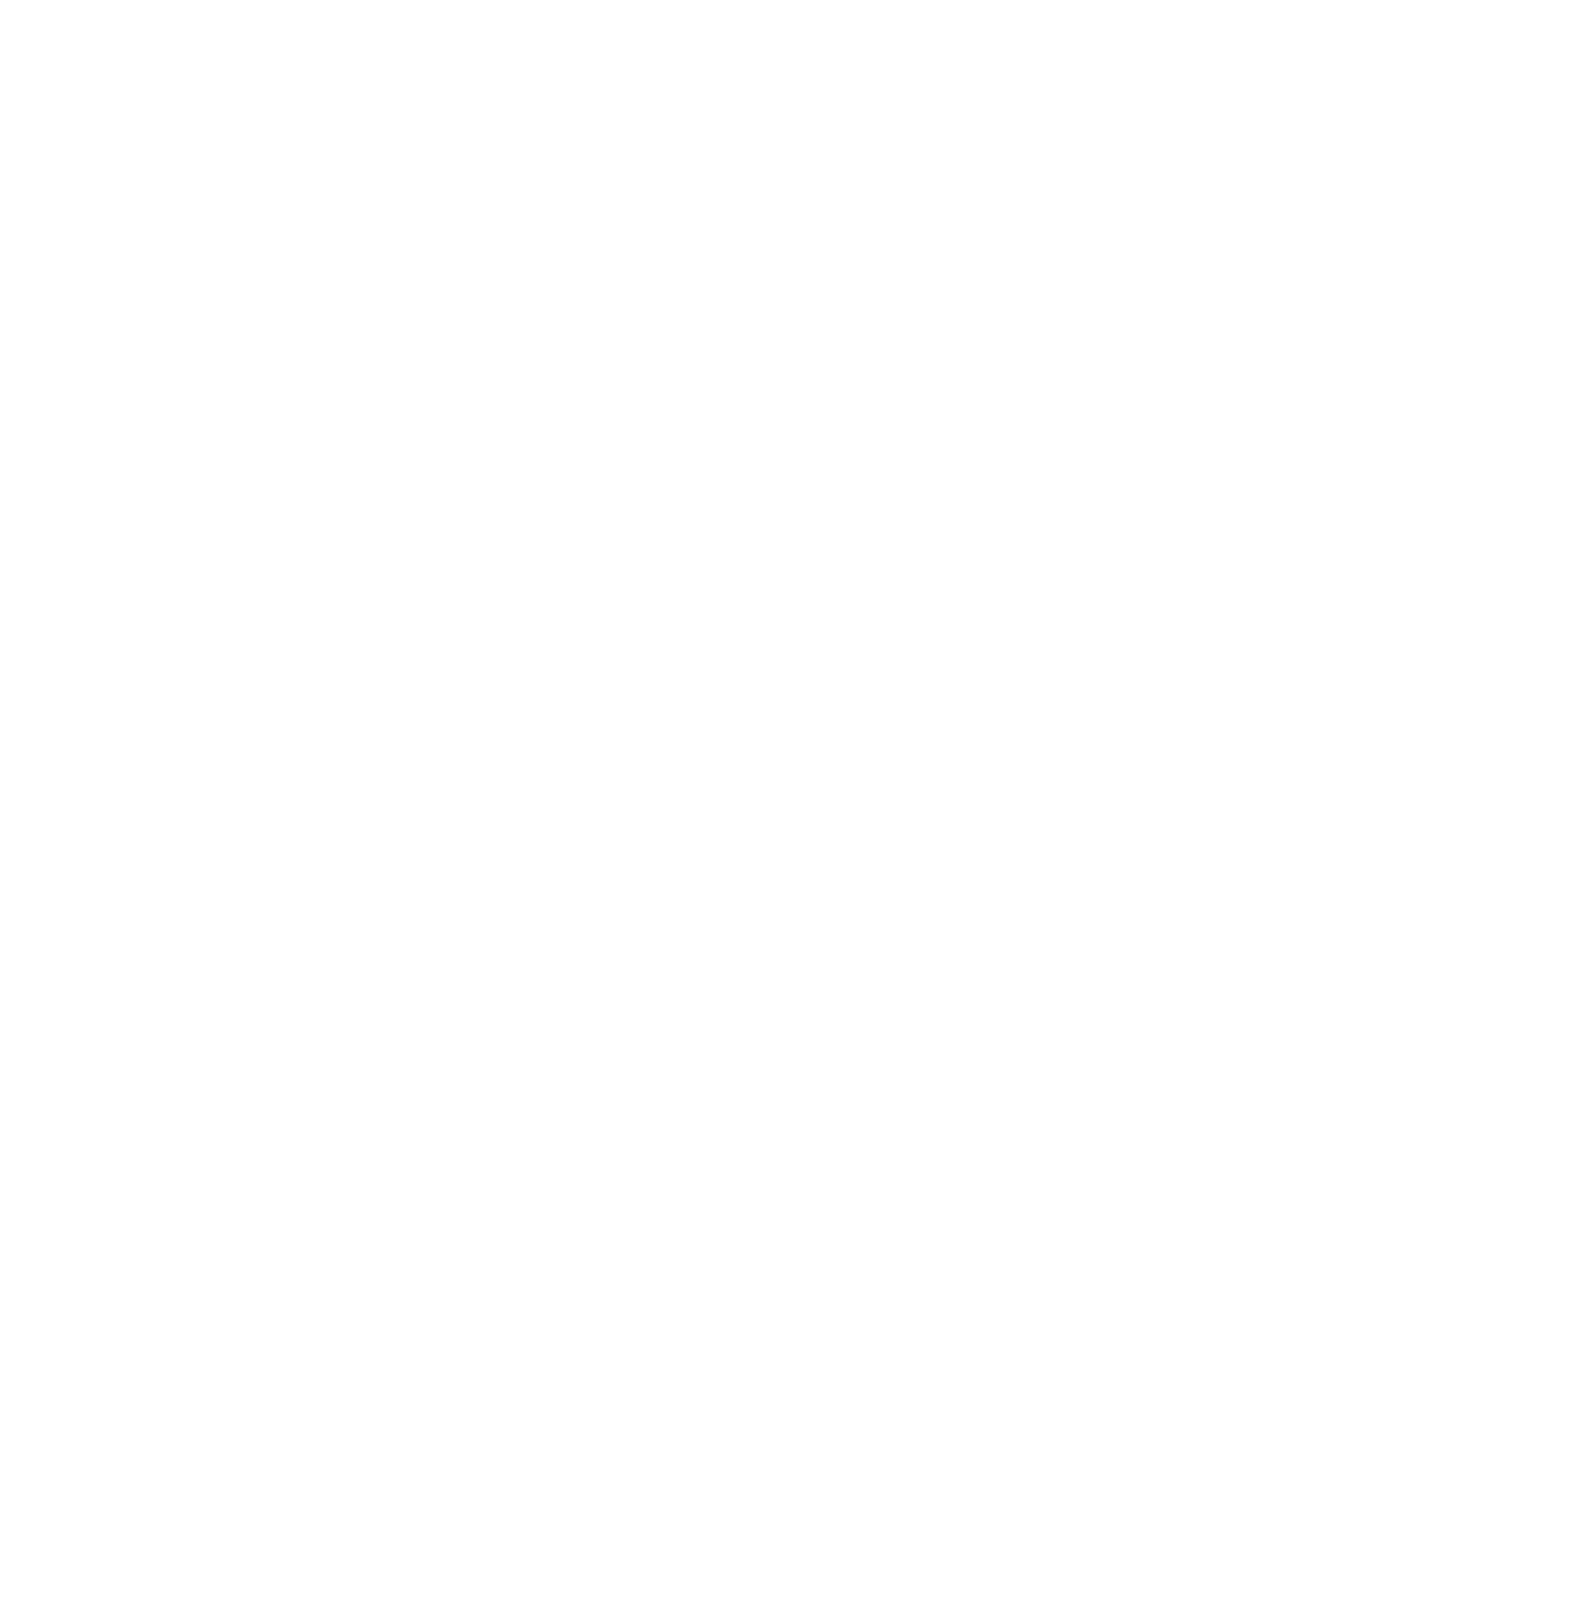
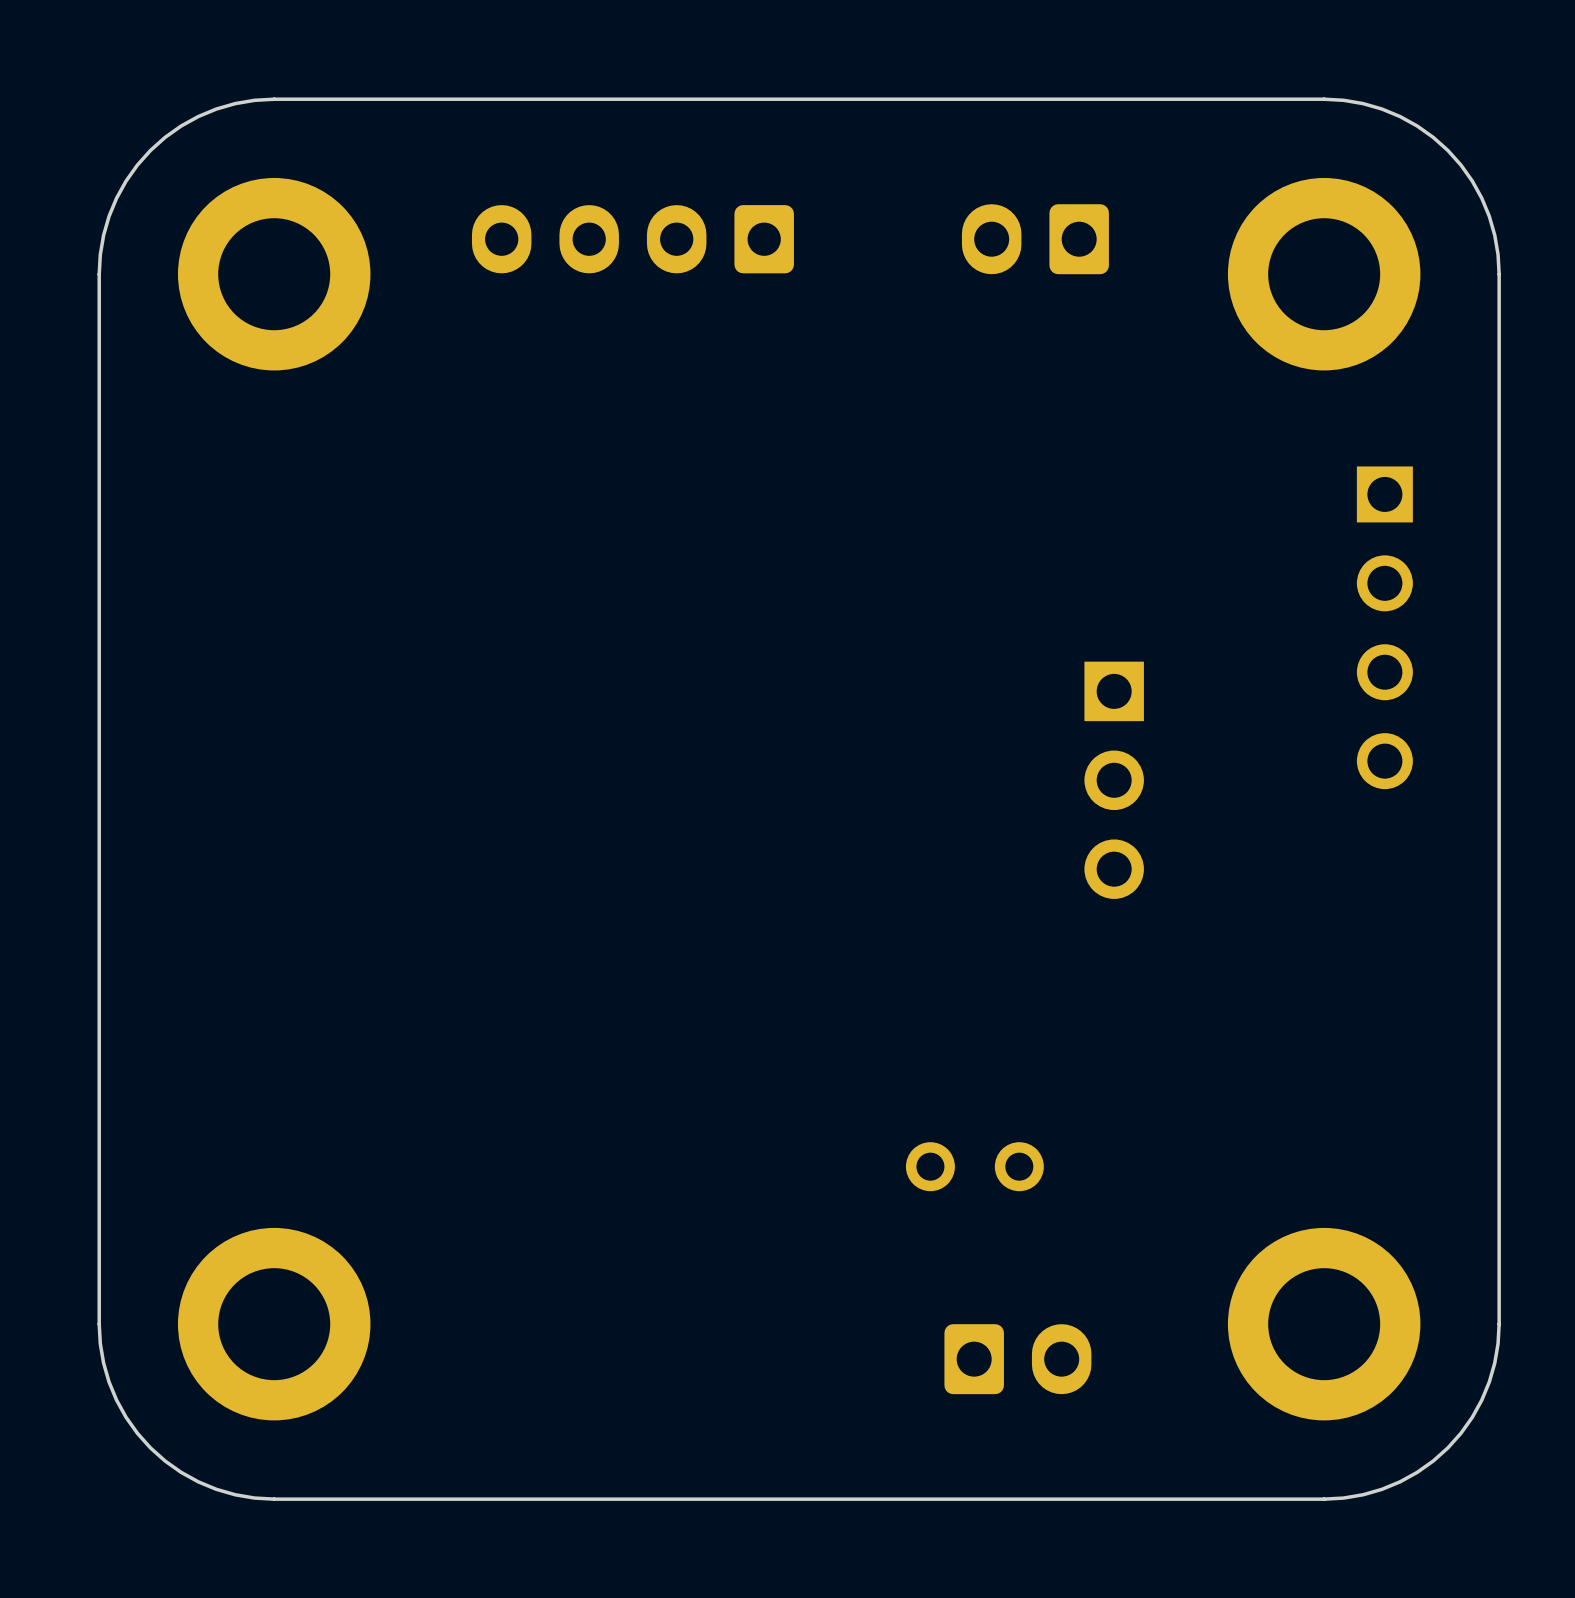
board edge: none -> (1324, 99) (274, 99) (235, 103) (198, 116) (165, 137) (137, 165) (116, 198) (109, 216) (100, 254) (99, 274) (99, 1324) (103, 1363) (116, 1400) (137, 1433) (165, 1460) (198, 1481) (216, 1489) (235, 1494) (274, 1499) (1324, 1499) (1363, 1494) (1400, 1481) (1433, 1460) (1460, 1433) (1481, 1400) (1489, 1381) (1498, 1343) (1499, 1324) (1498, 254) (1489, 216) (1481, 198) (1460, 165) (1447, 150) (1433, 137) (1400, 116) (1363, 103) (1324, 99)
part: none -> (632, 239)
part: none -> (1035, 239)
part: none -> (274, 274)
part: none -> (1324, 274)
part: none -> (1384, 627)
part: none -> (1114, 780)
part: none -> (974, 1166)
part: none -> (274, 1324)
part: none -> (1324, 1324)
part: none -> (1017, 1359)

